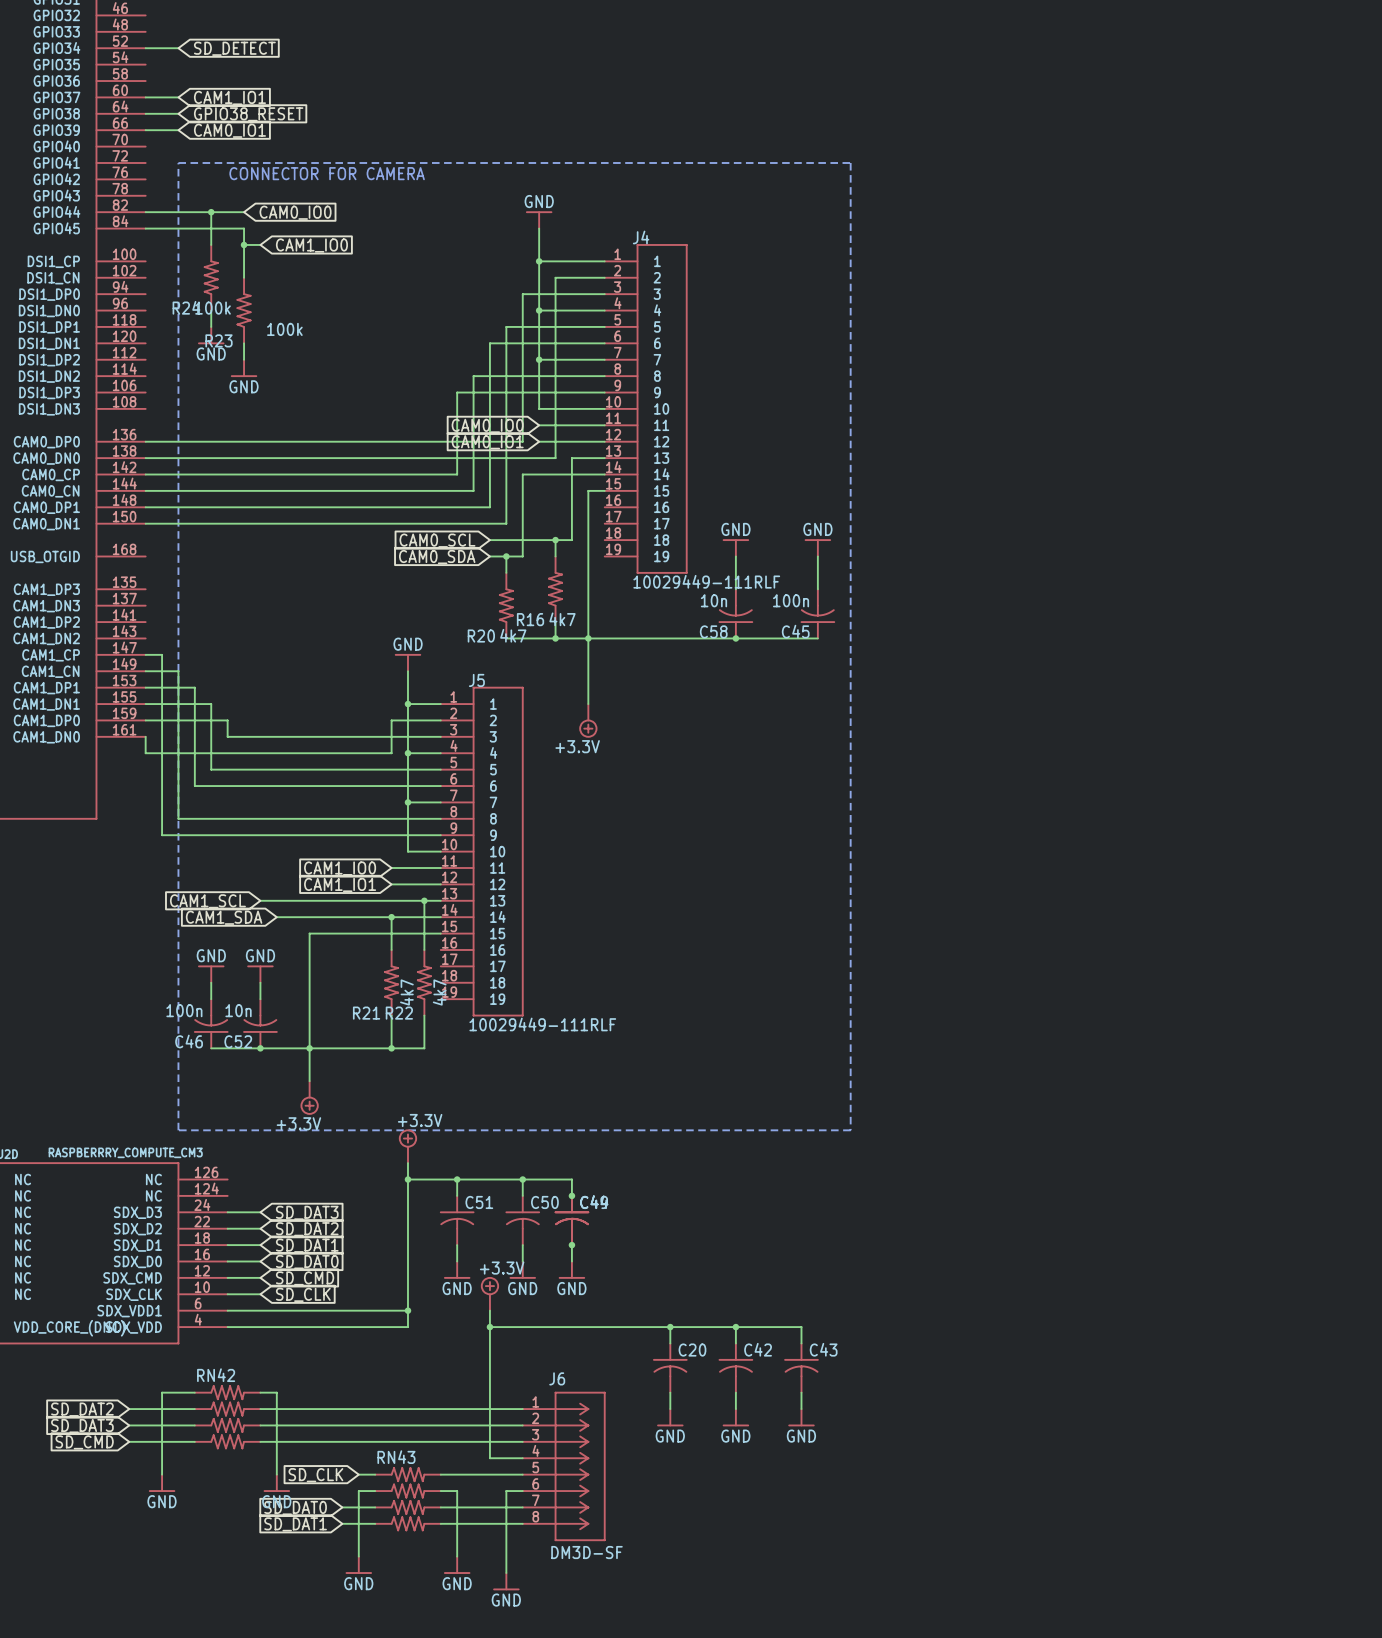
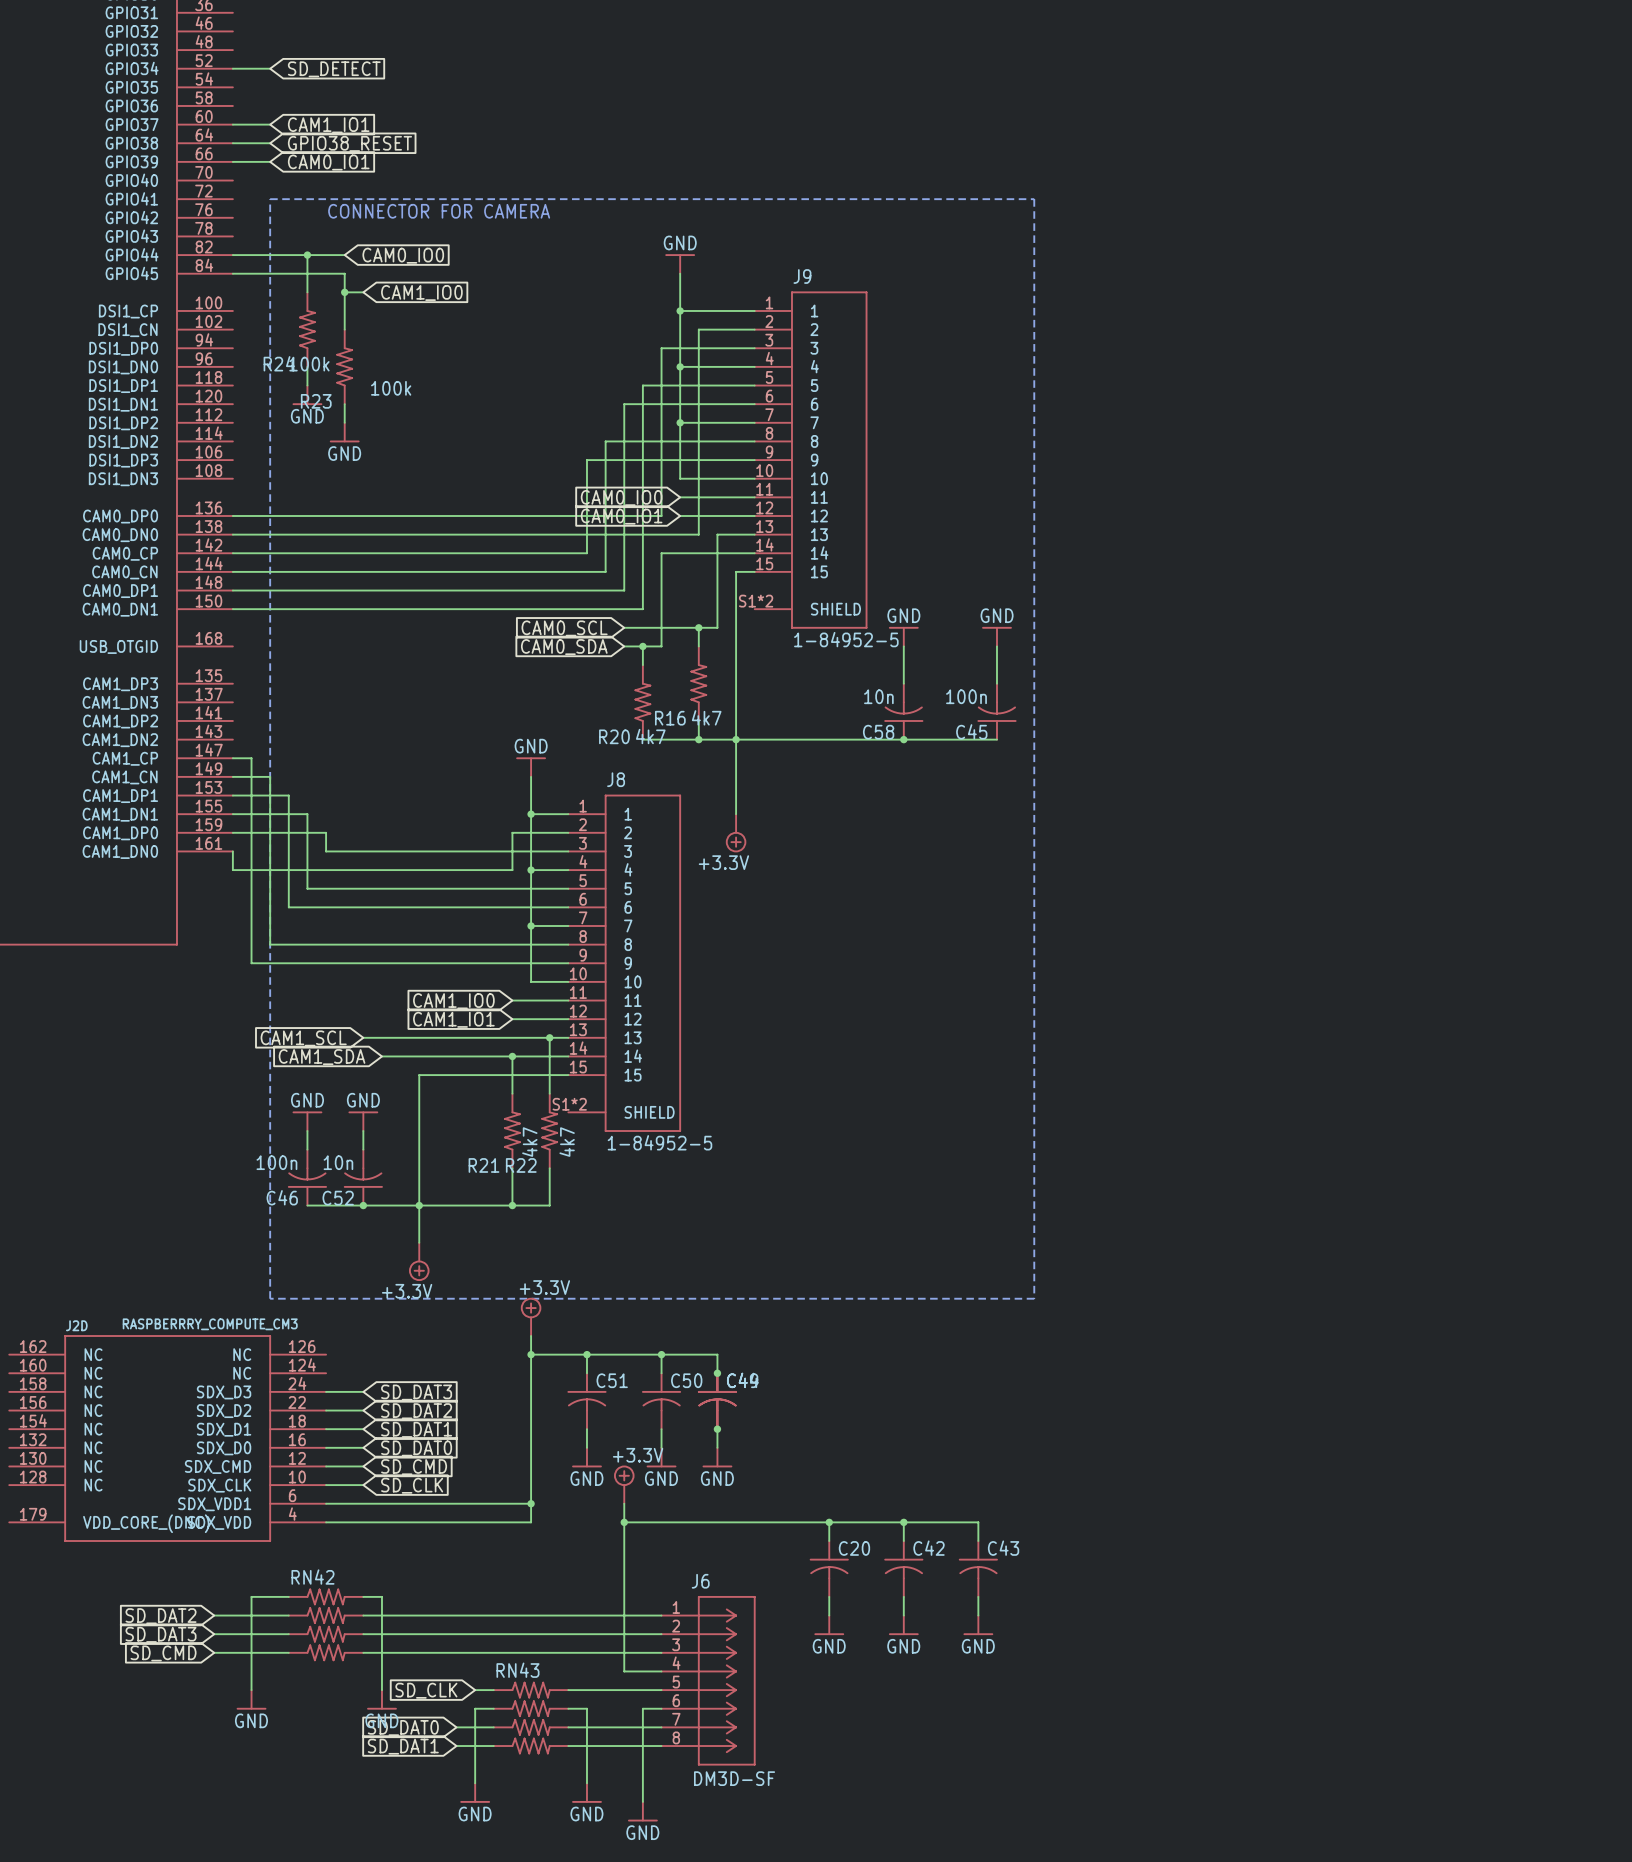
J9: none -> 1-84952-5 (811, 460)
J4: 10029449-111RLF (645, 408) -> none
J8: none -> 1-84952-5 (624, 963)
J5: 10029449-111RLF (482, 851) -> none

